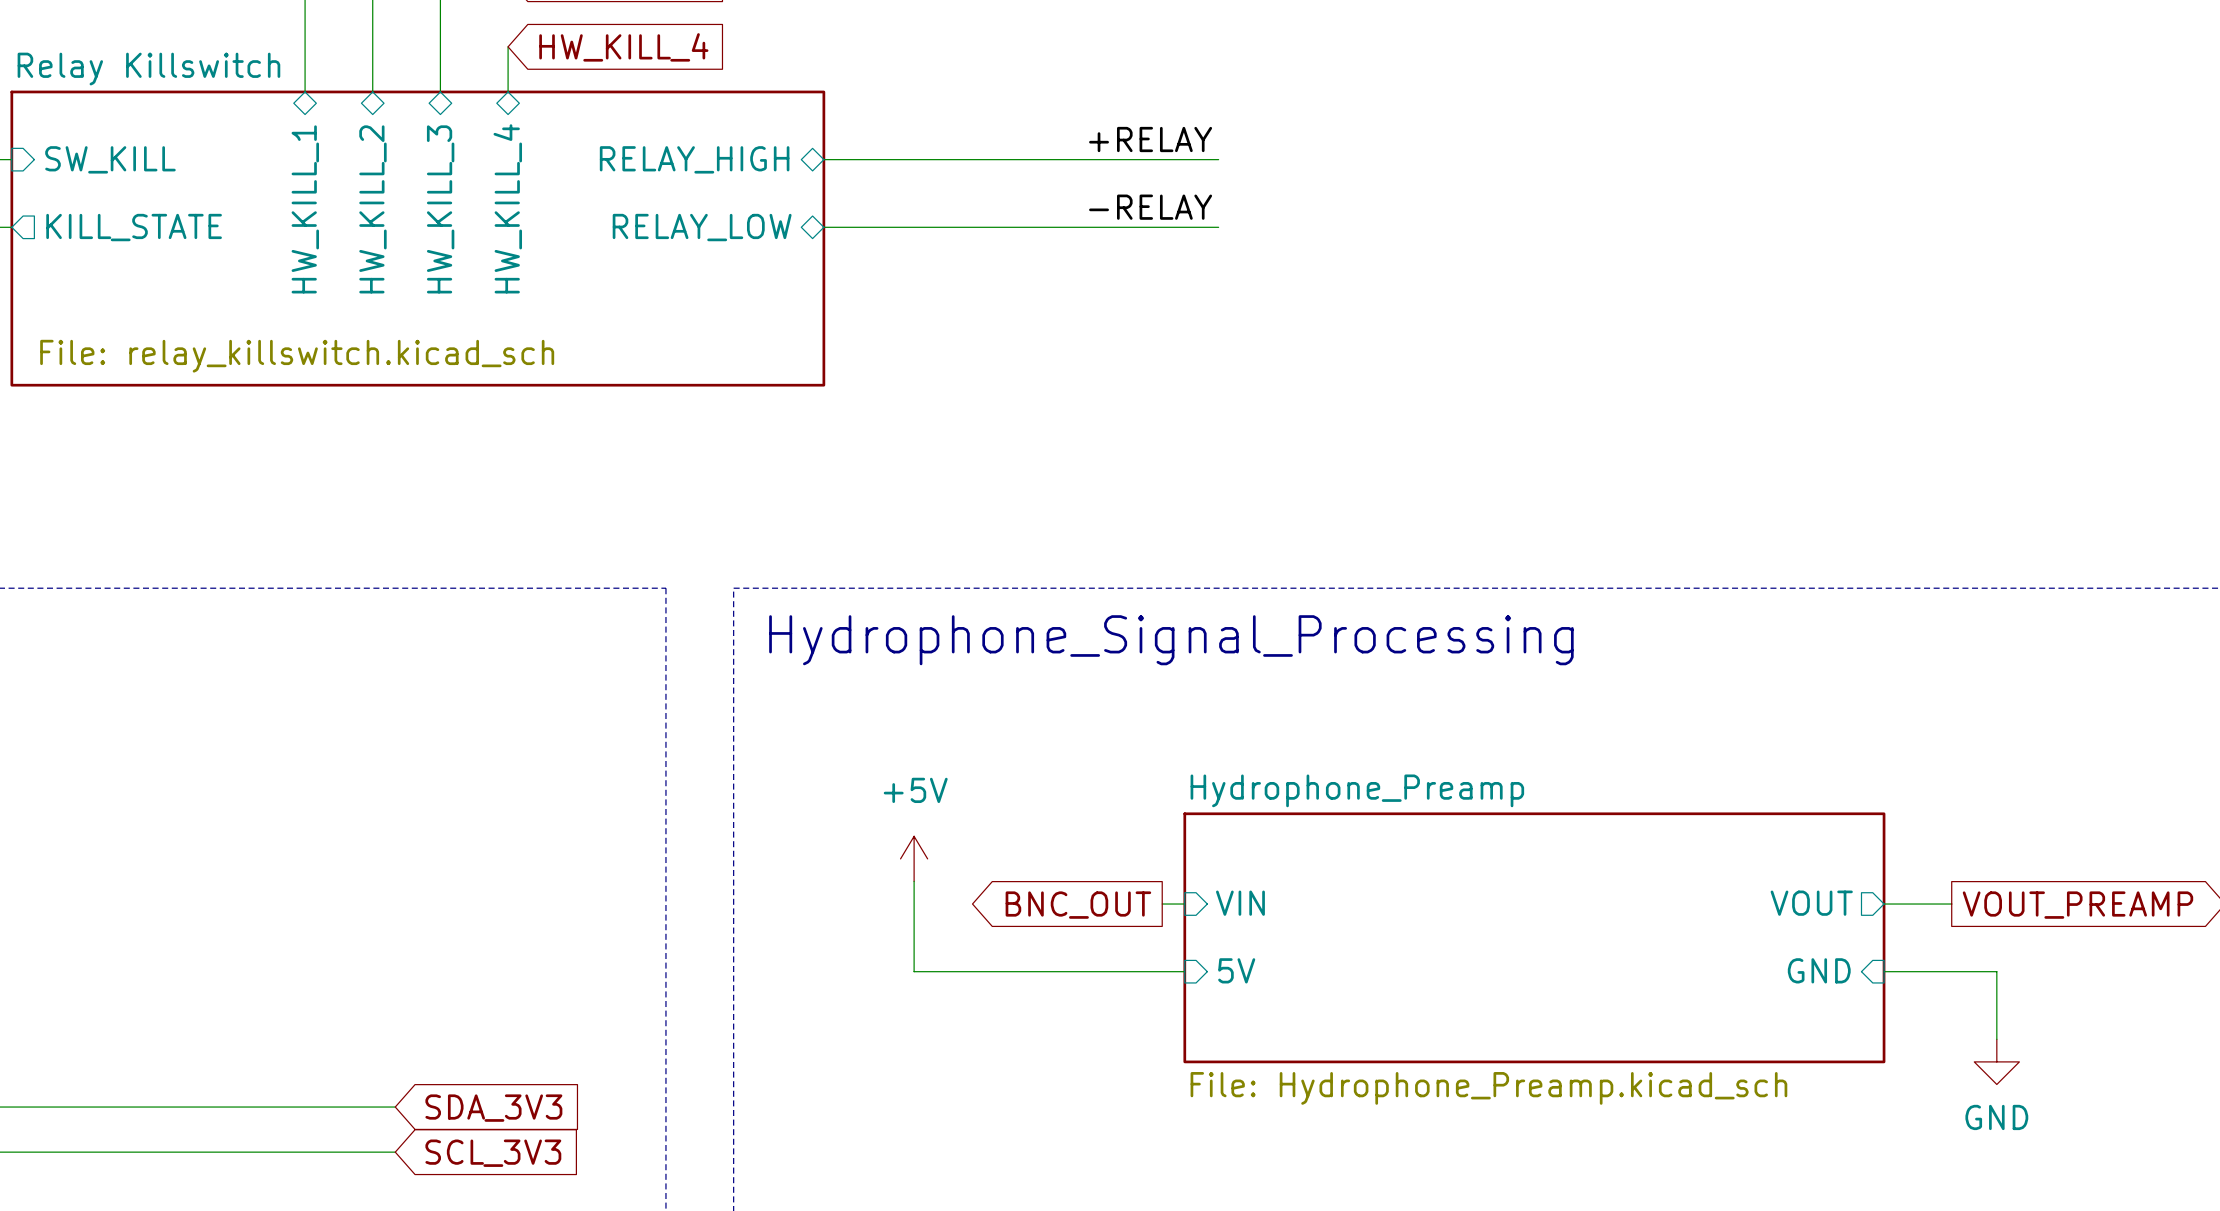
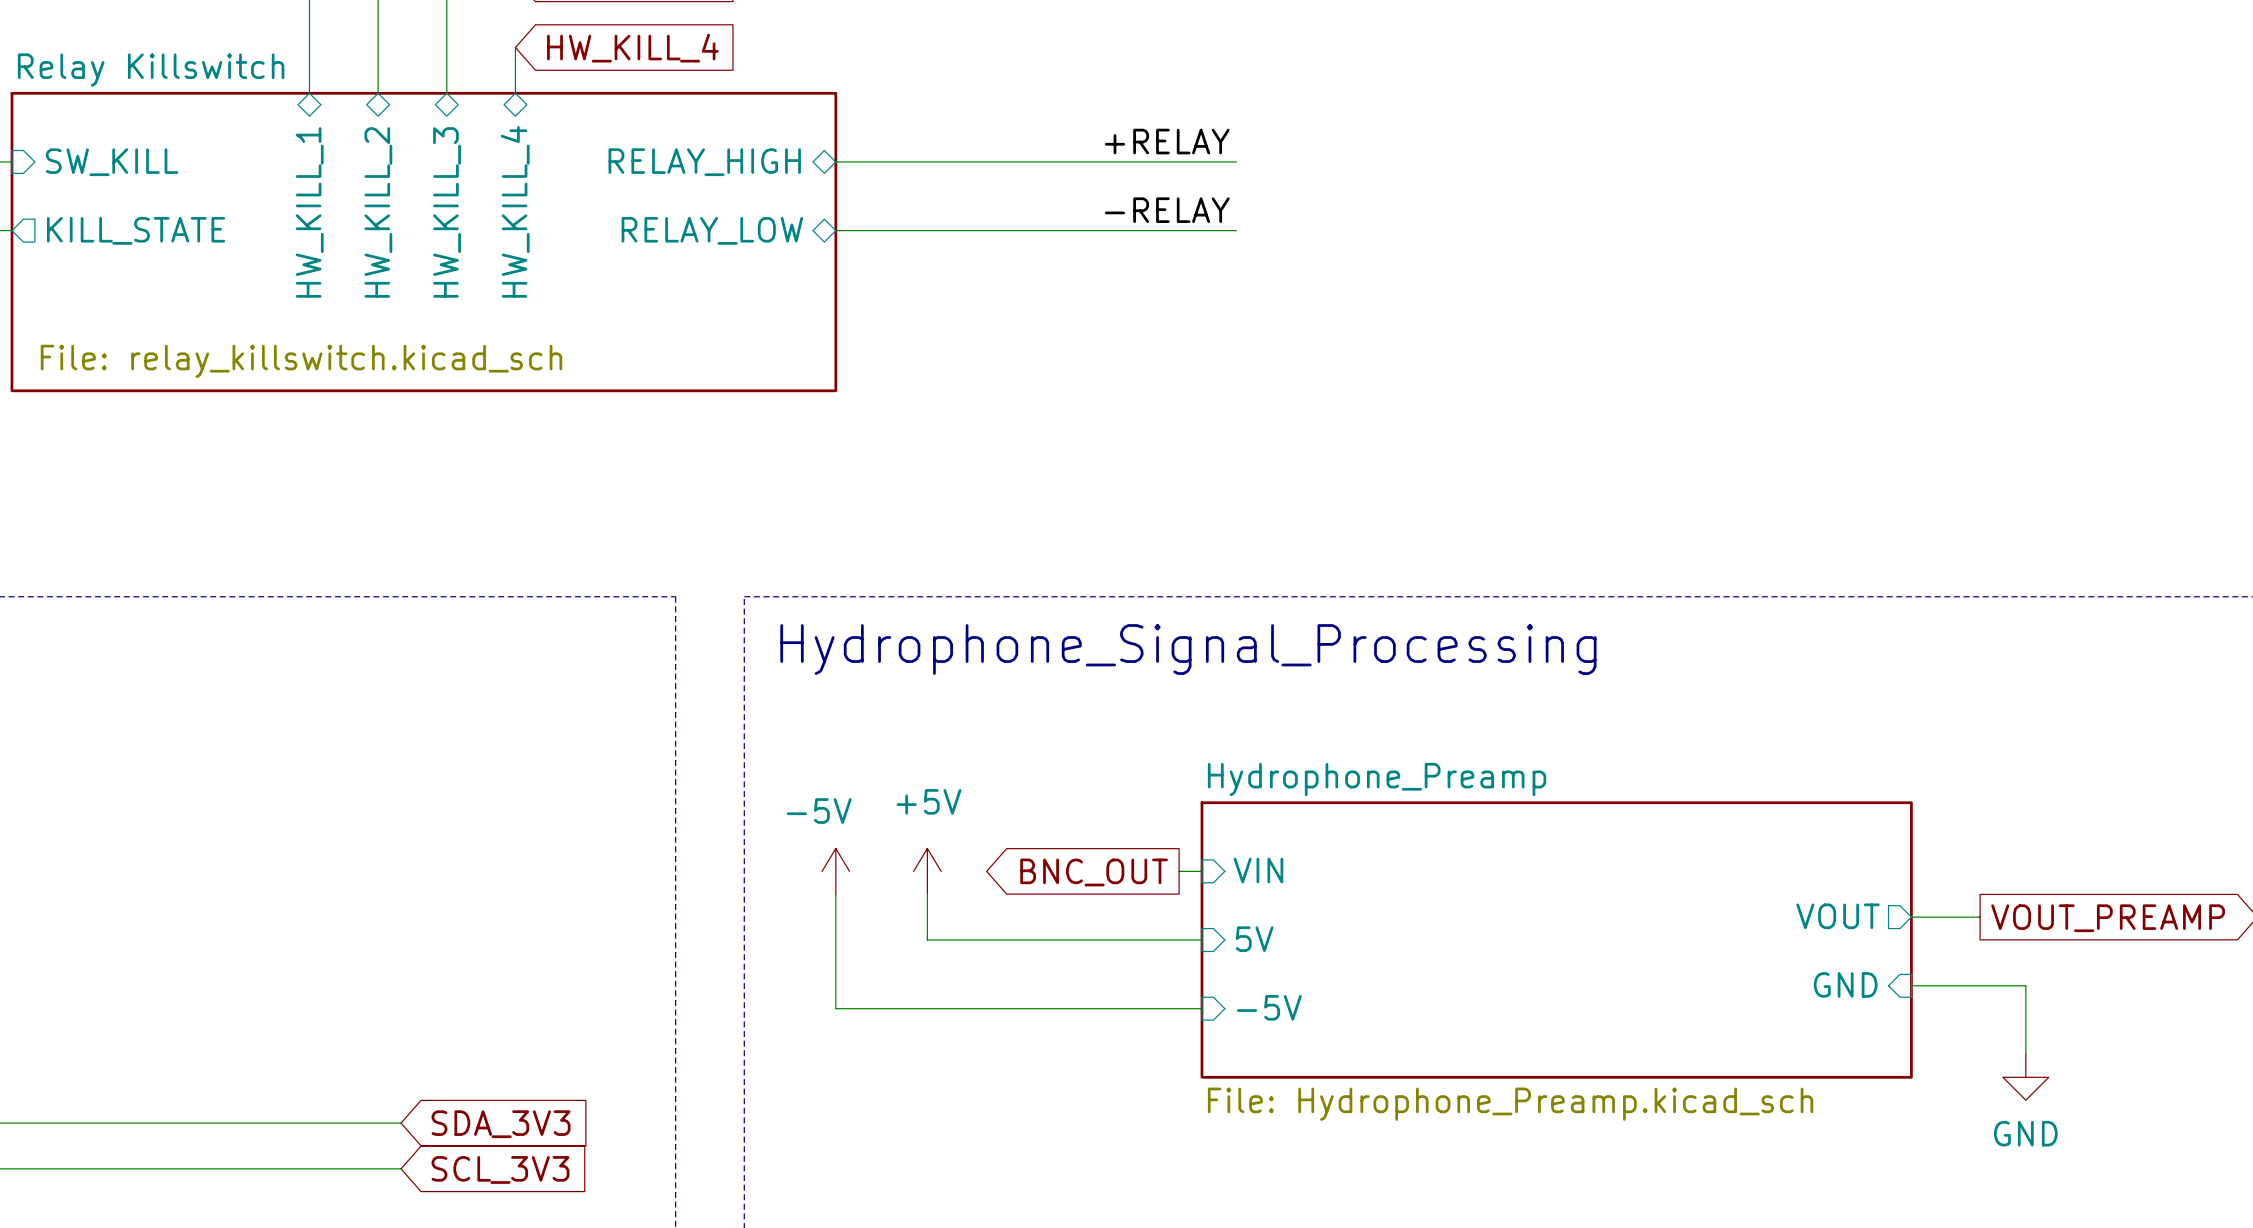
sheet Hydrophone_Preamp shape: [1183, 812, 1886, 1064] -> [1200, 801, 1913, 1079]
power symbol: none -> -5V (835, 871)
wire: none -> (835, 894) (835, 1008) (1201, 1008)
sheet pin position: VIN (1240, 903) -> VIN (1258, 870)
wire: (1162, 904) (1184, 904) -> (1179, 871) (1201, 871)
global label position: BNC_OUT (1078, 905) -> BNC_OUT (1094, 872)
wire: (914, 926) (914, 971) (1184, 971) -> (927, 940) (1201, 940)
sheet pin position: 5V (1236, 970) -> 5V (1254, 939)
sheet pin: none -> -5V (1269, 1007)

